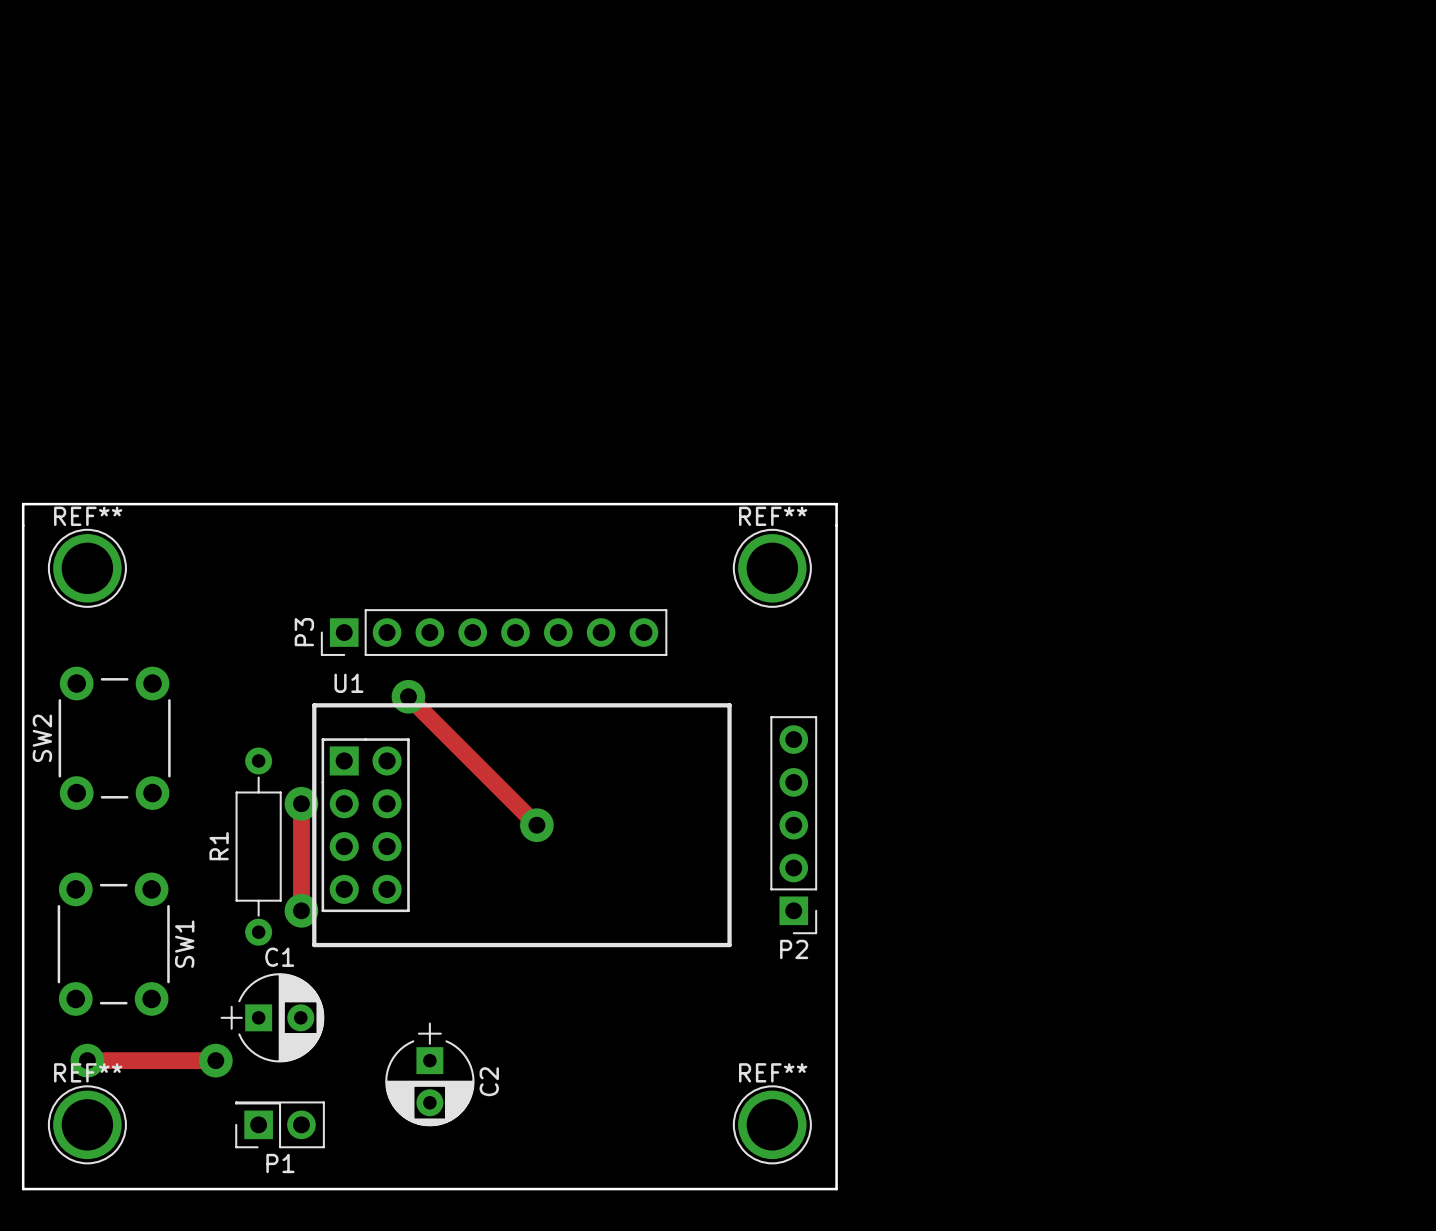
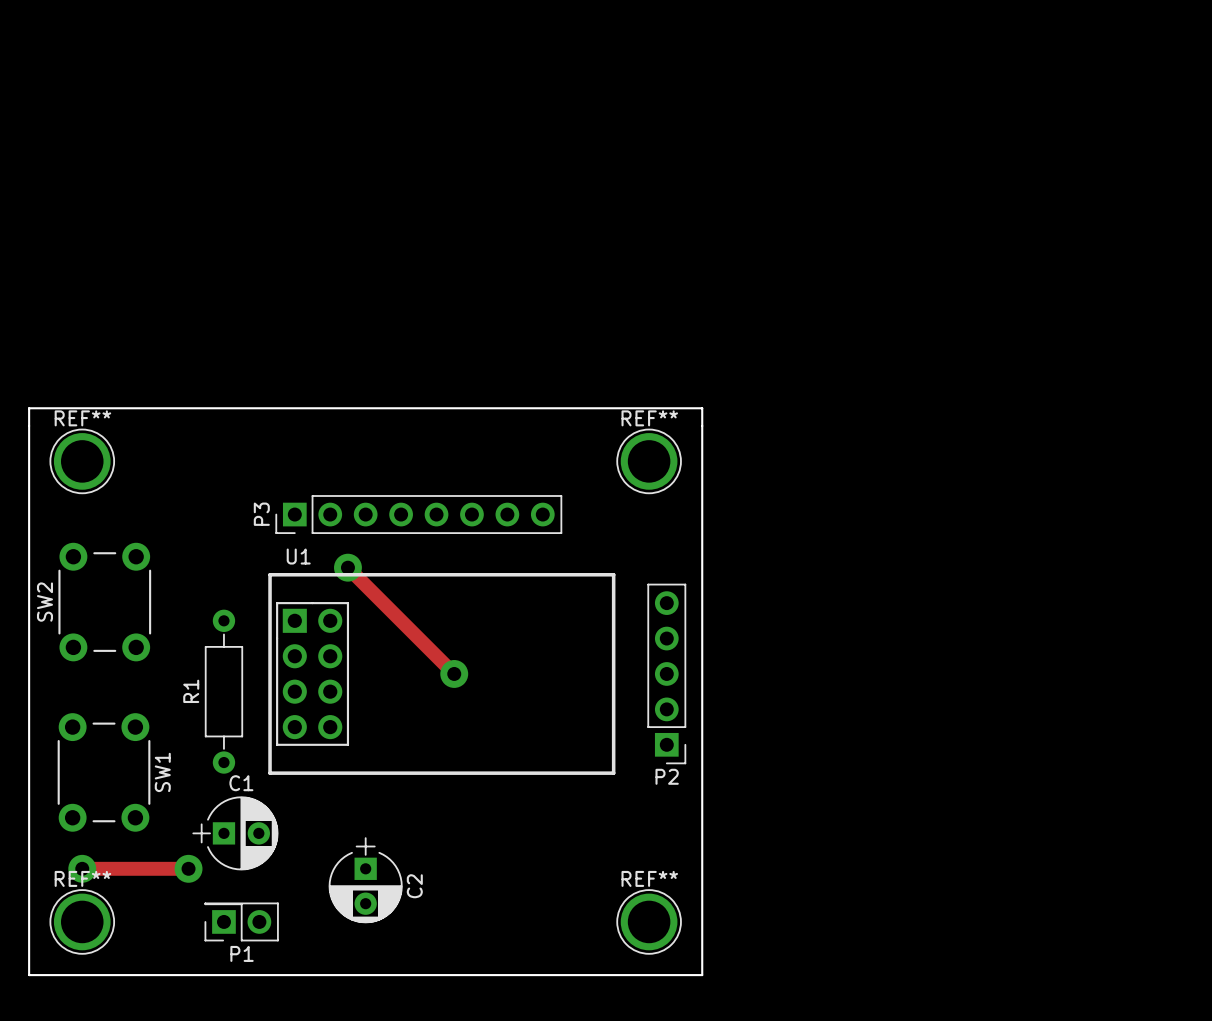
track: (301, 803) (301, 910) -> none
via: (301, 803) -> none
via: (301, 910) -> none

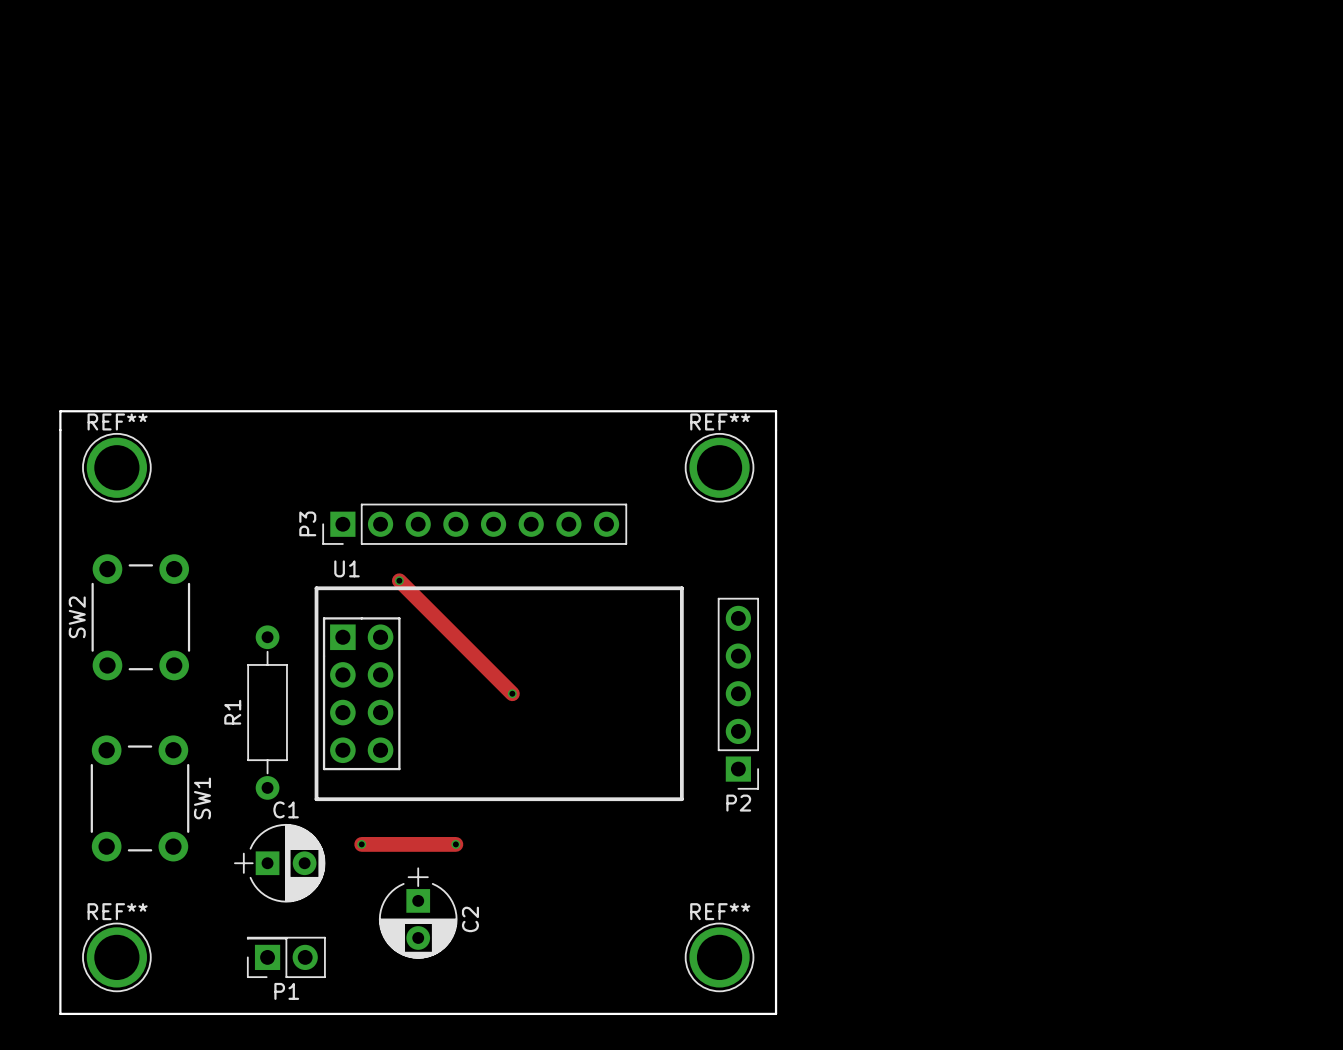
via size: [334, 553, 362, 582] -> [394, 576, 404, 586]
via size: [440, 660, 469, 688] -> [507, 689, 517, 699]
track: none -> (361, 844) (455, 844)
via: none -> (361, 844)
via: none -> (455, 844)
track: (82, 868) (188, 868) -> none
via: (82, 868) -> none
via: (188, 868) -> none

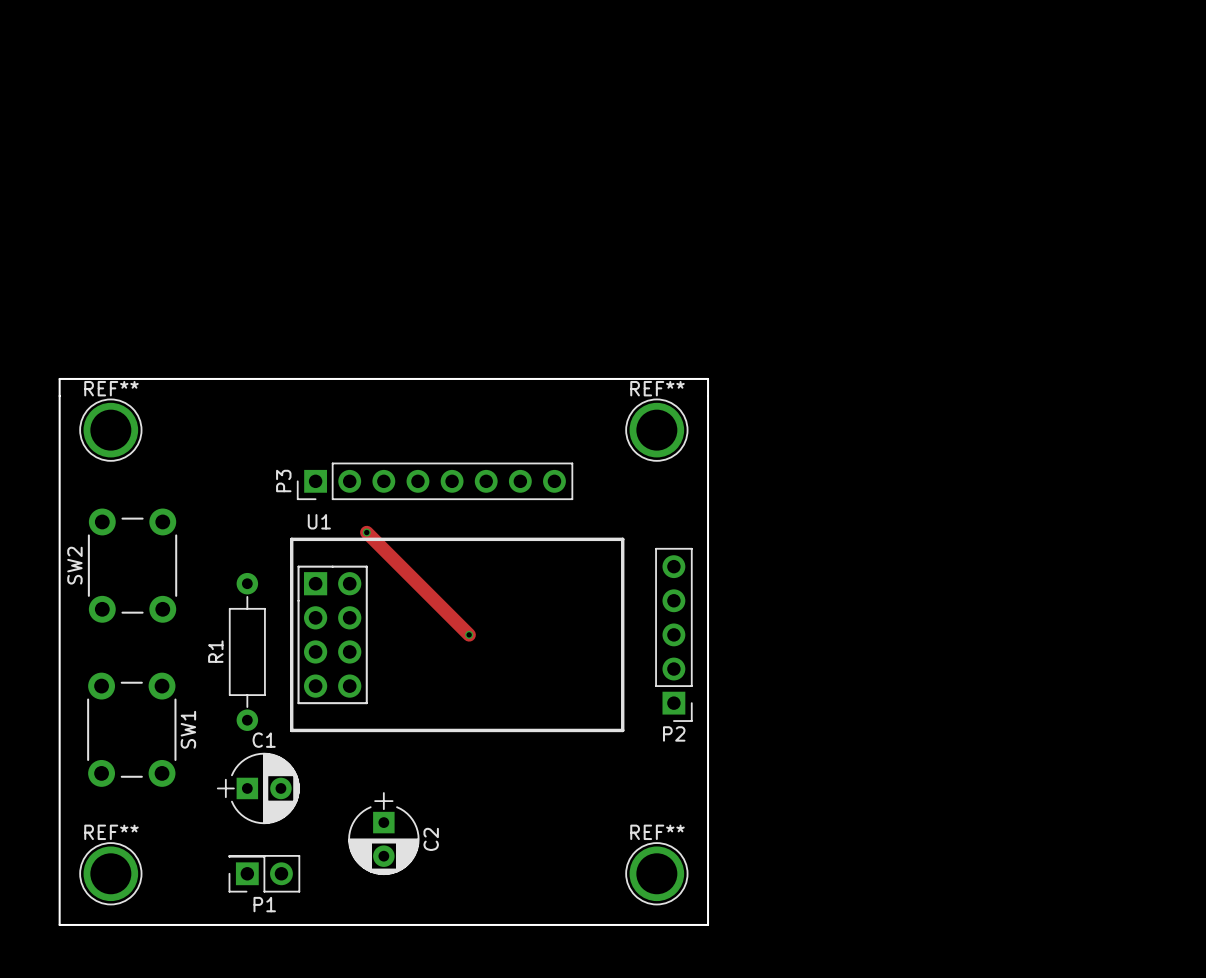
track: (361, 844) (455, 844) -> none
via: (361, 844) -> none
via: (455, 844) -> none

